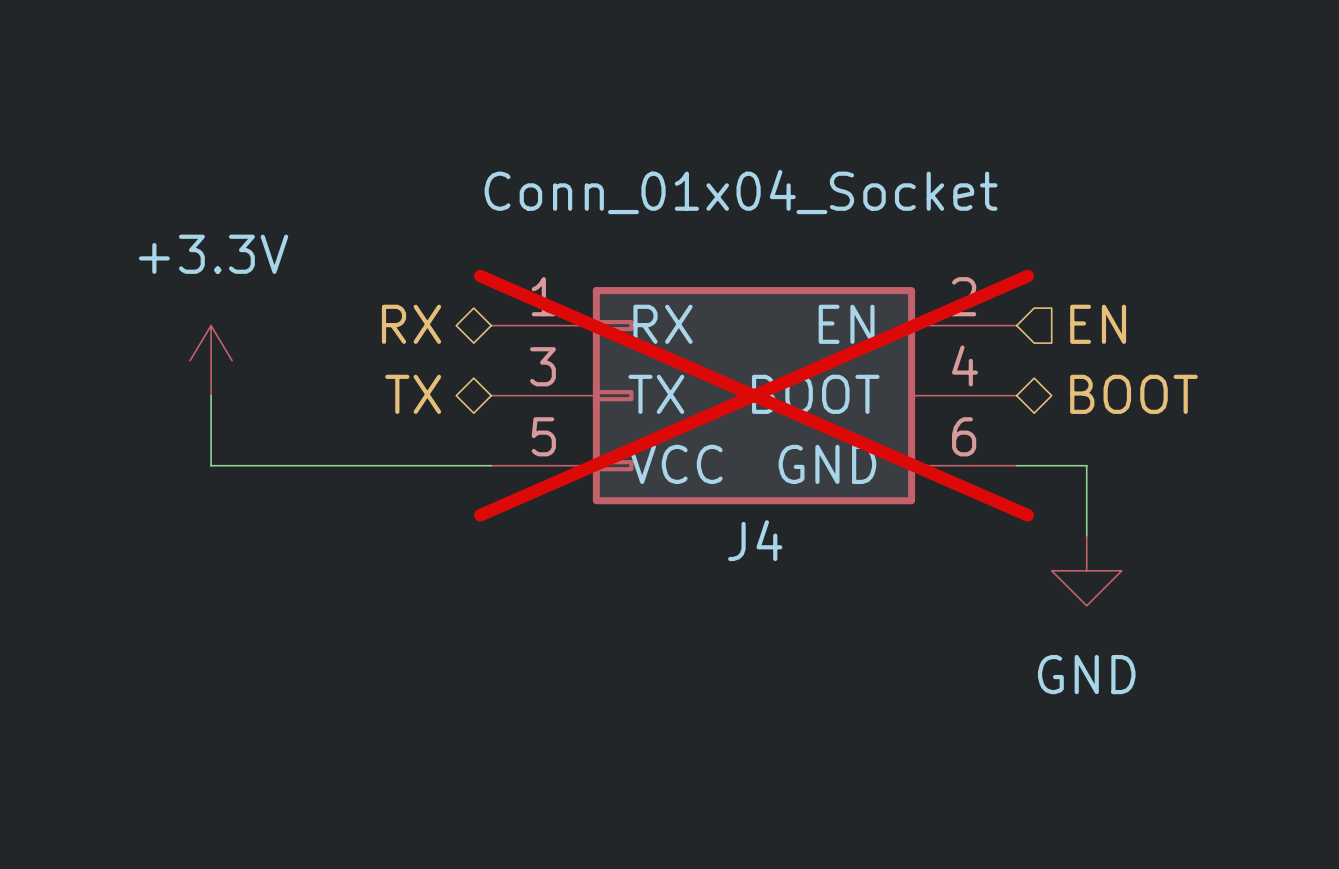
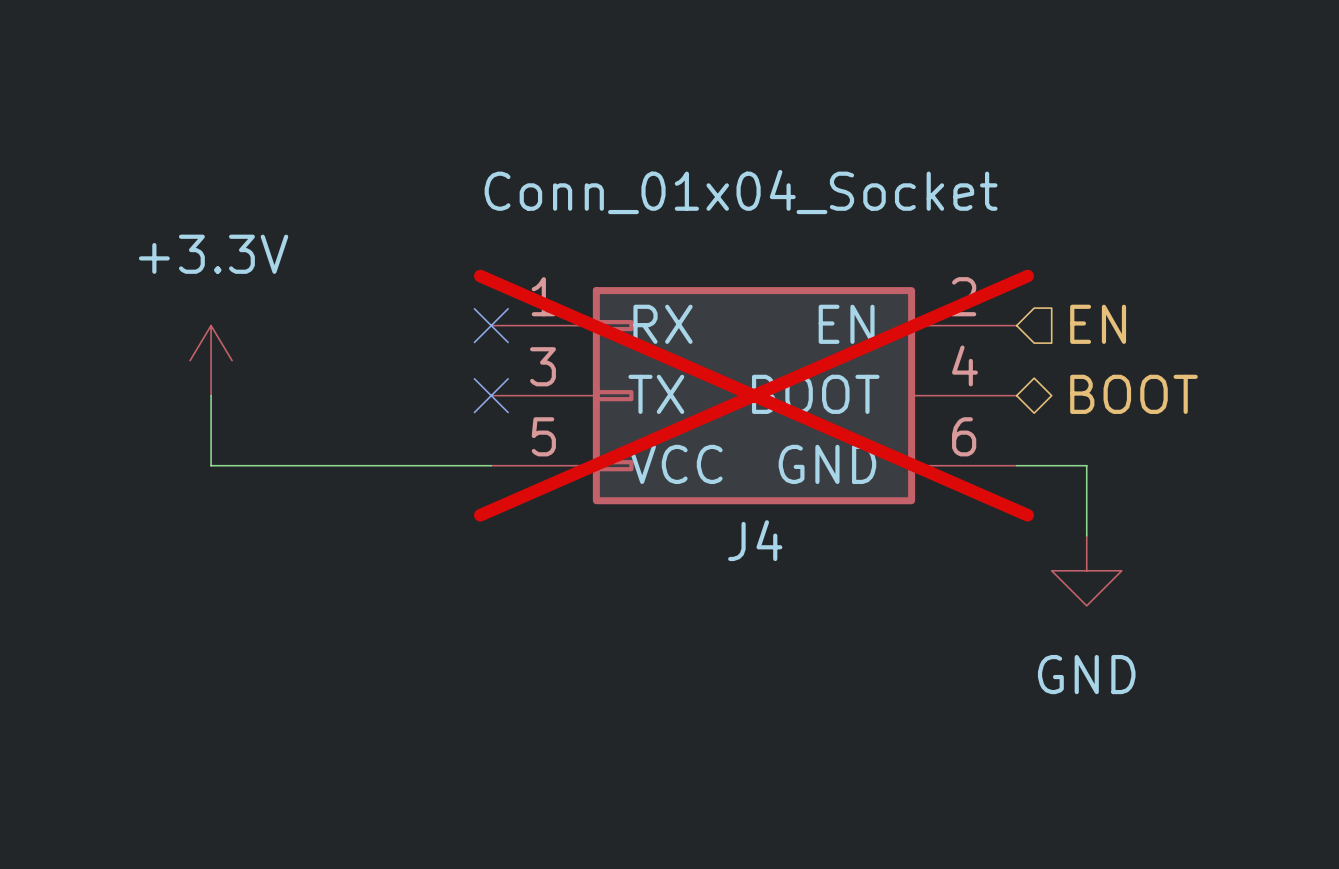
hierarchical label: RX (411, 324) -> none
no-connect mark: none -> (491, 325)
hierarchical label: TX (413, 394) -> none
no-connect mark: none -> (491, 395)

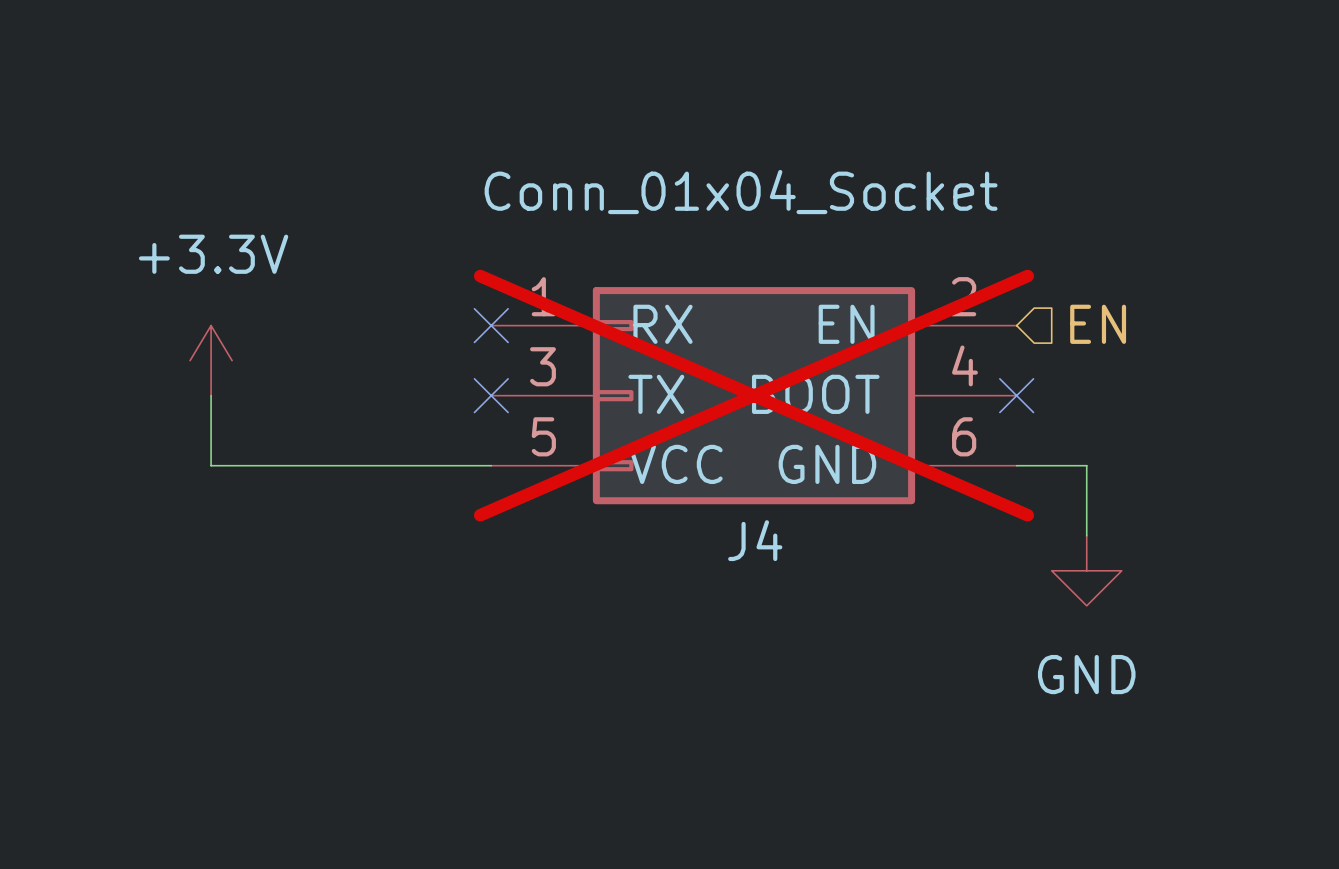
hierarchical label: BOOT (1133, 394) -> none
no-connect mark: none -> (1016, 395)

